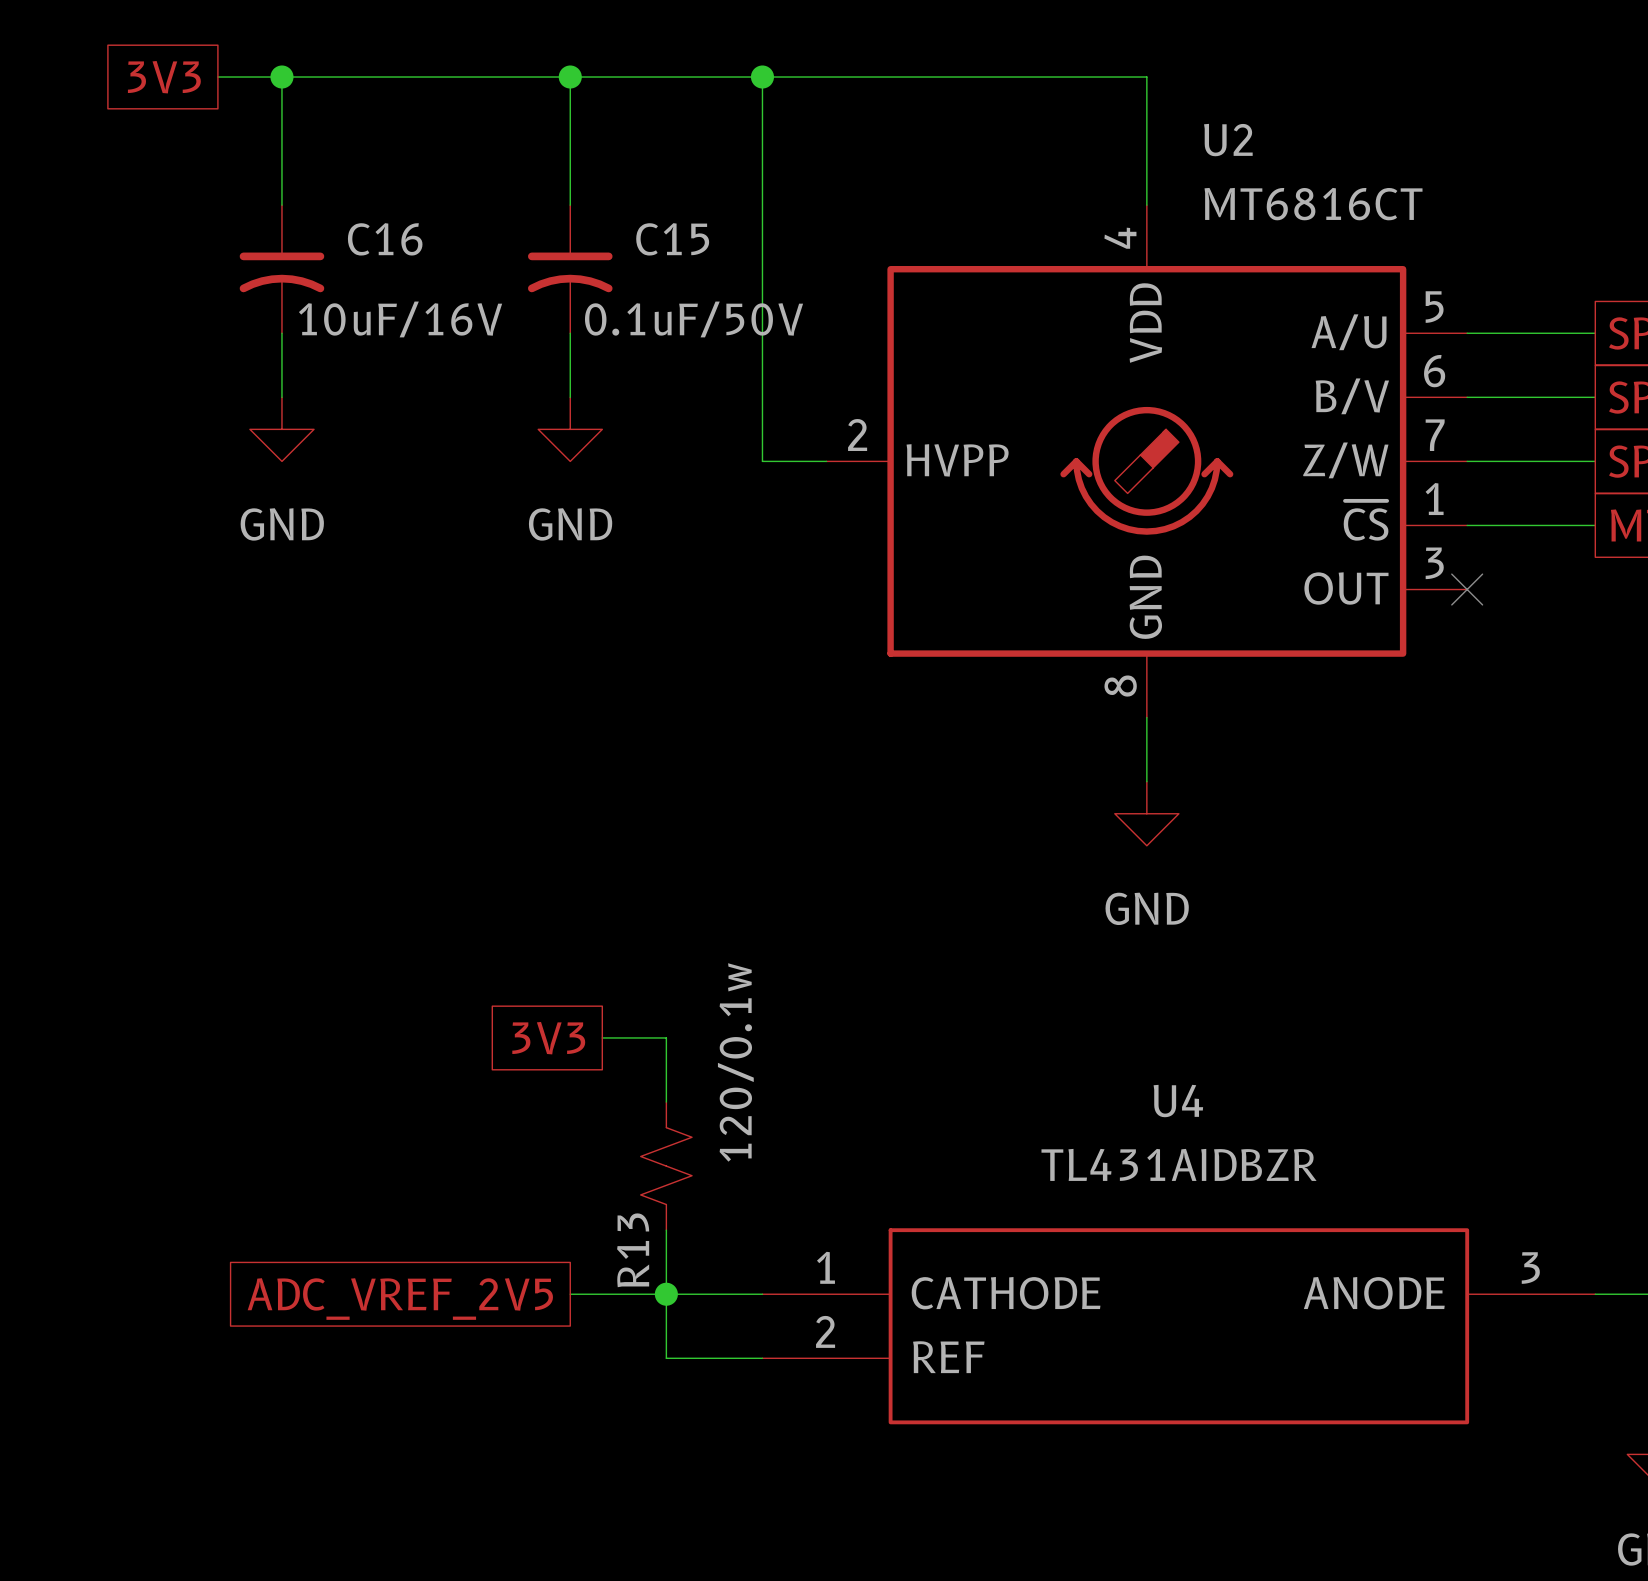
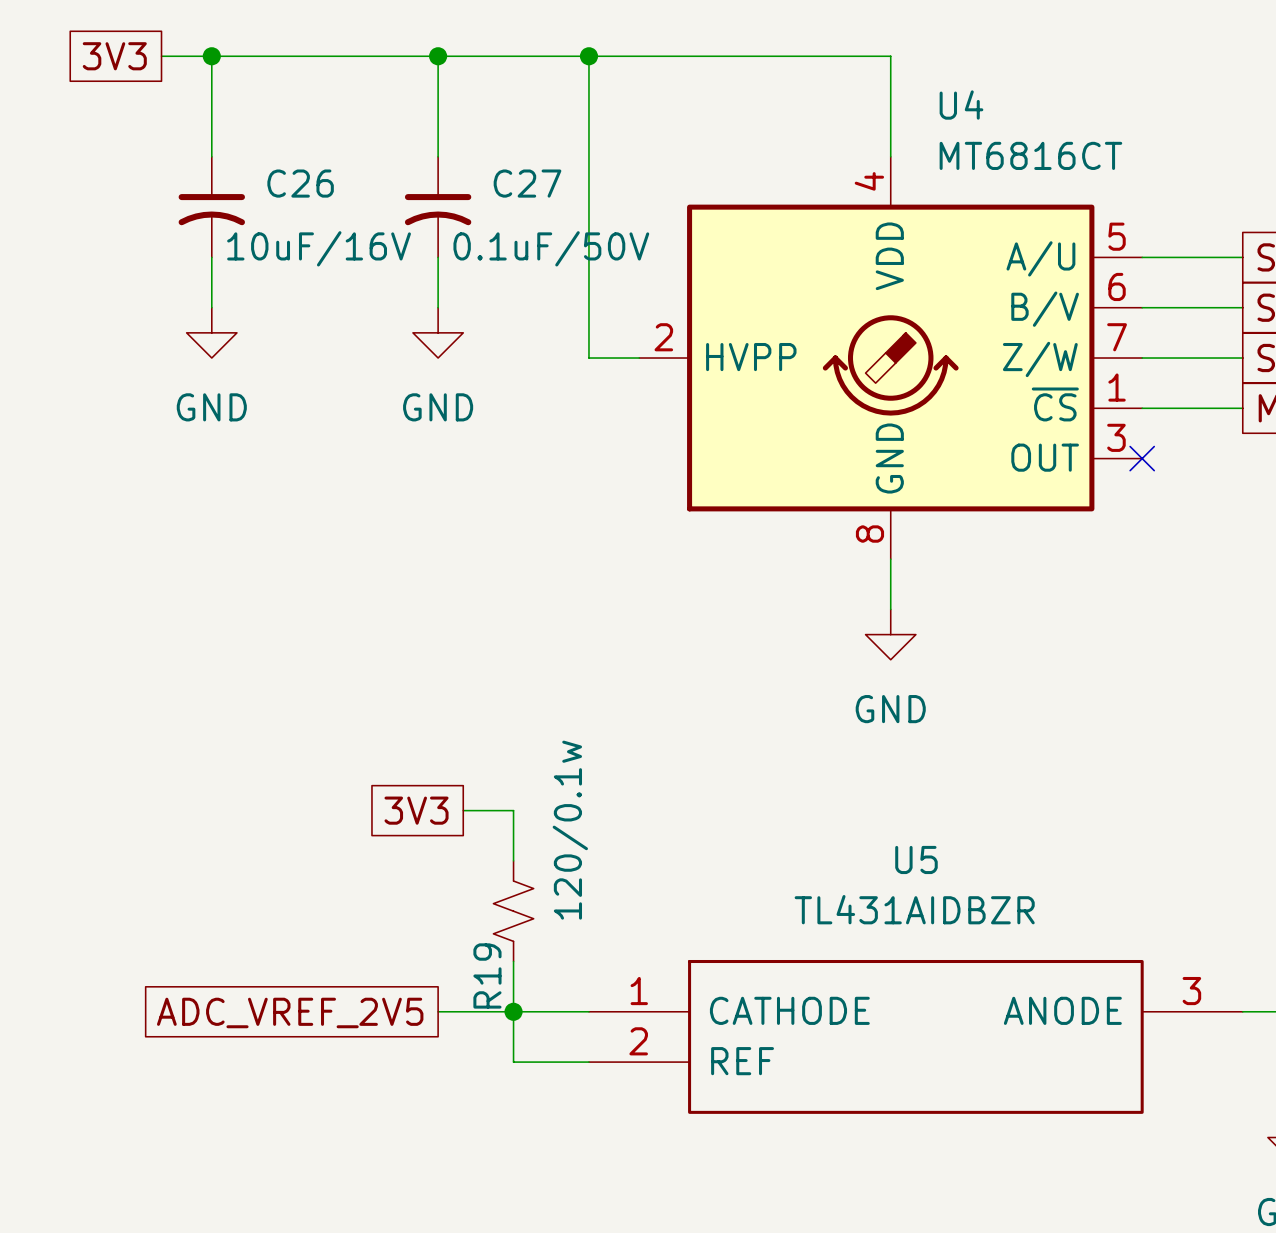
U2 name: U2 (1228, 140) -> U4 (961, 105)
C16 name: C16 (385, 239) -> C26 (300, 183)
C15 name: C15 (672, 239) -> C27 (527, 183)
U4 name: U4 (1178, 1101) -> U5 (916, 859)
R13 name: R13 (633, 1250) -> R19 (487, 975)

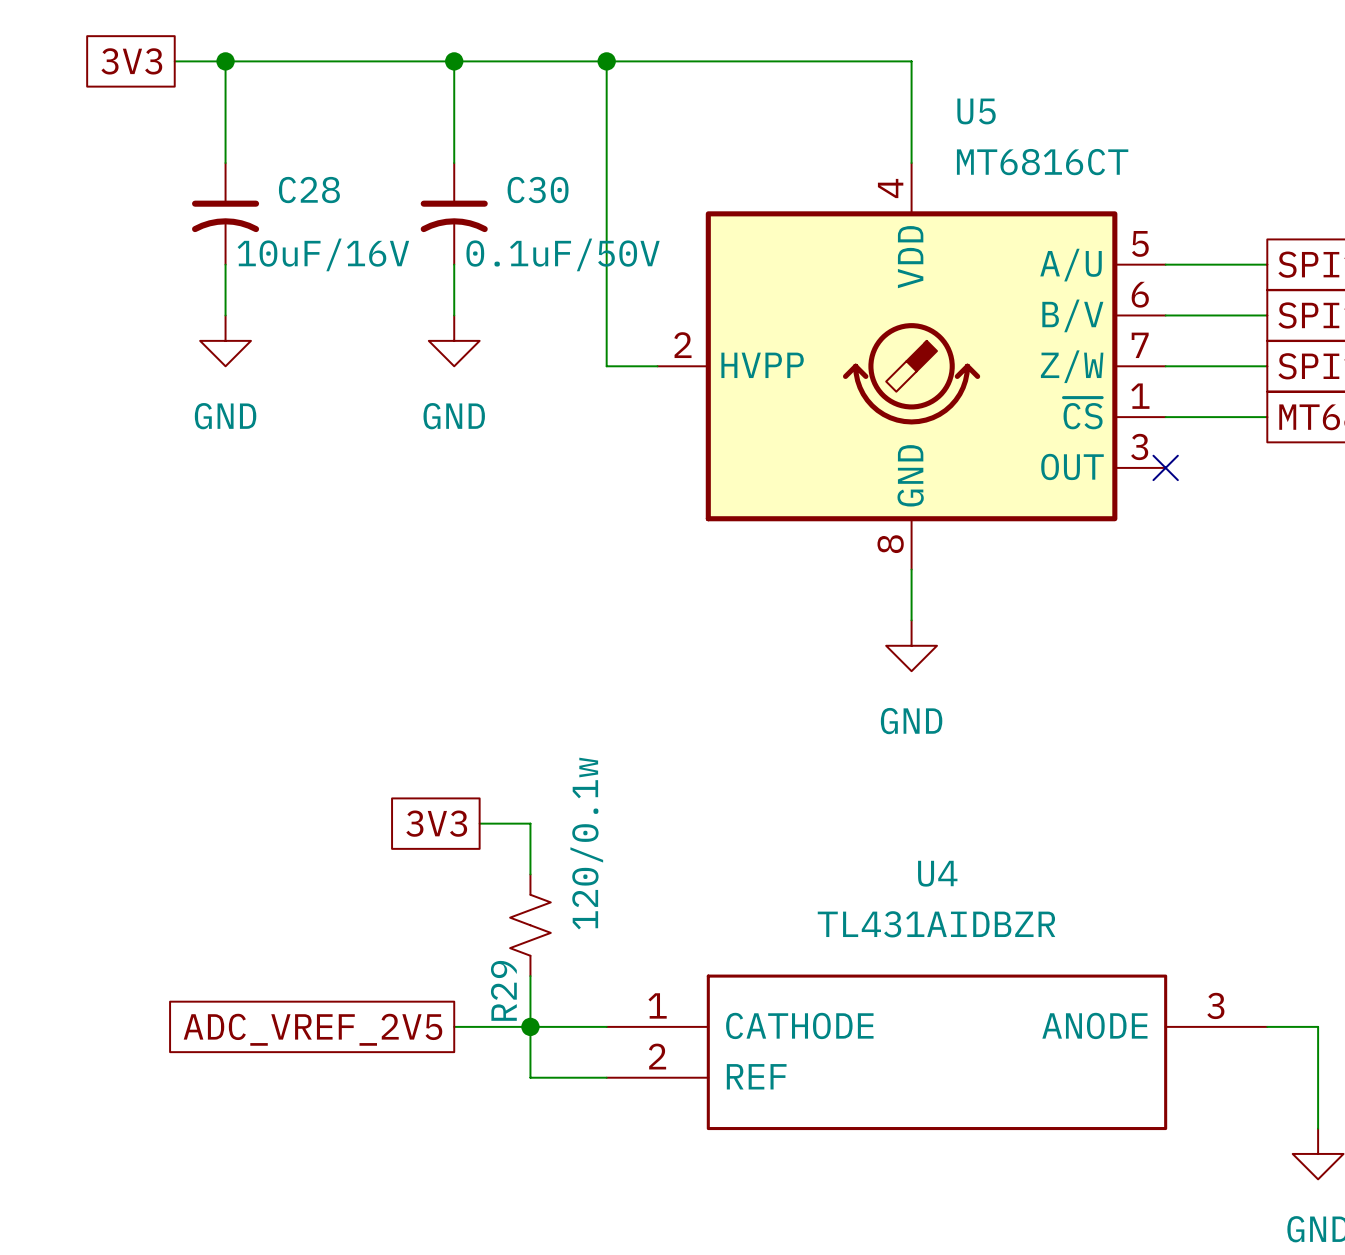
U4 name: U4 (961, 105) -> U5 (976, 111)
C26 name: C26 (300, 183) -> C28 (309, 190)
C27 name: C27 (527, 183) -> C30 (538, 190)
U5 name: U5 (916, 859) -> U4 (937, 873)
R19 name: R19 (487, 975) -> R29 (503, 990)

